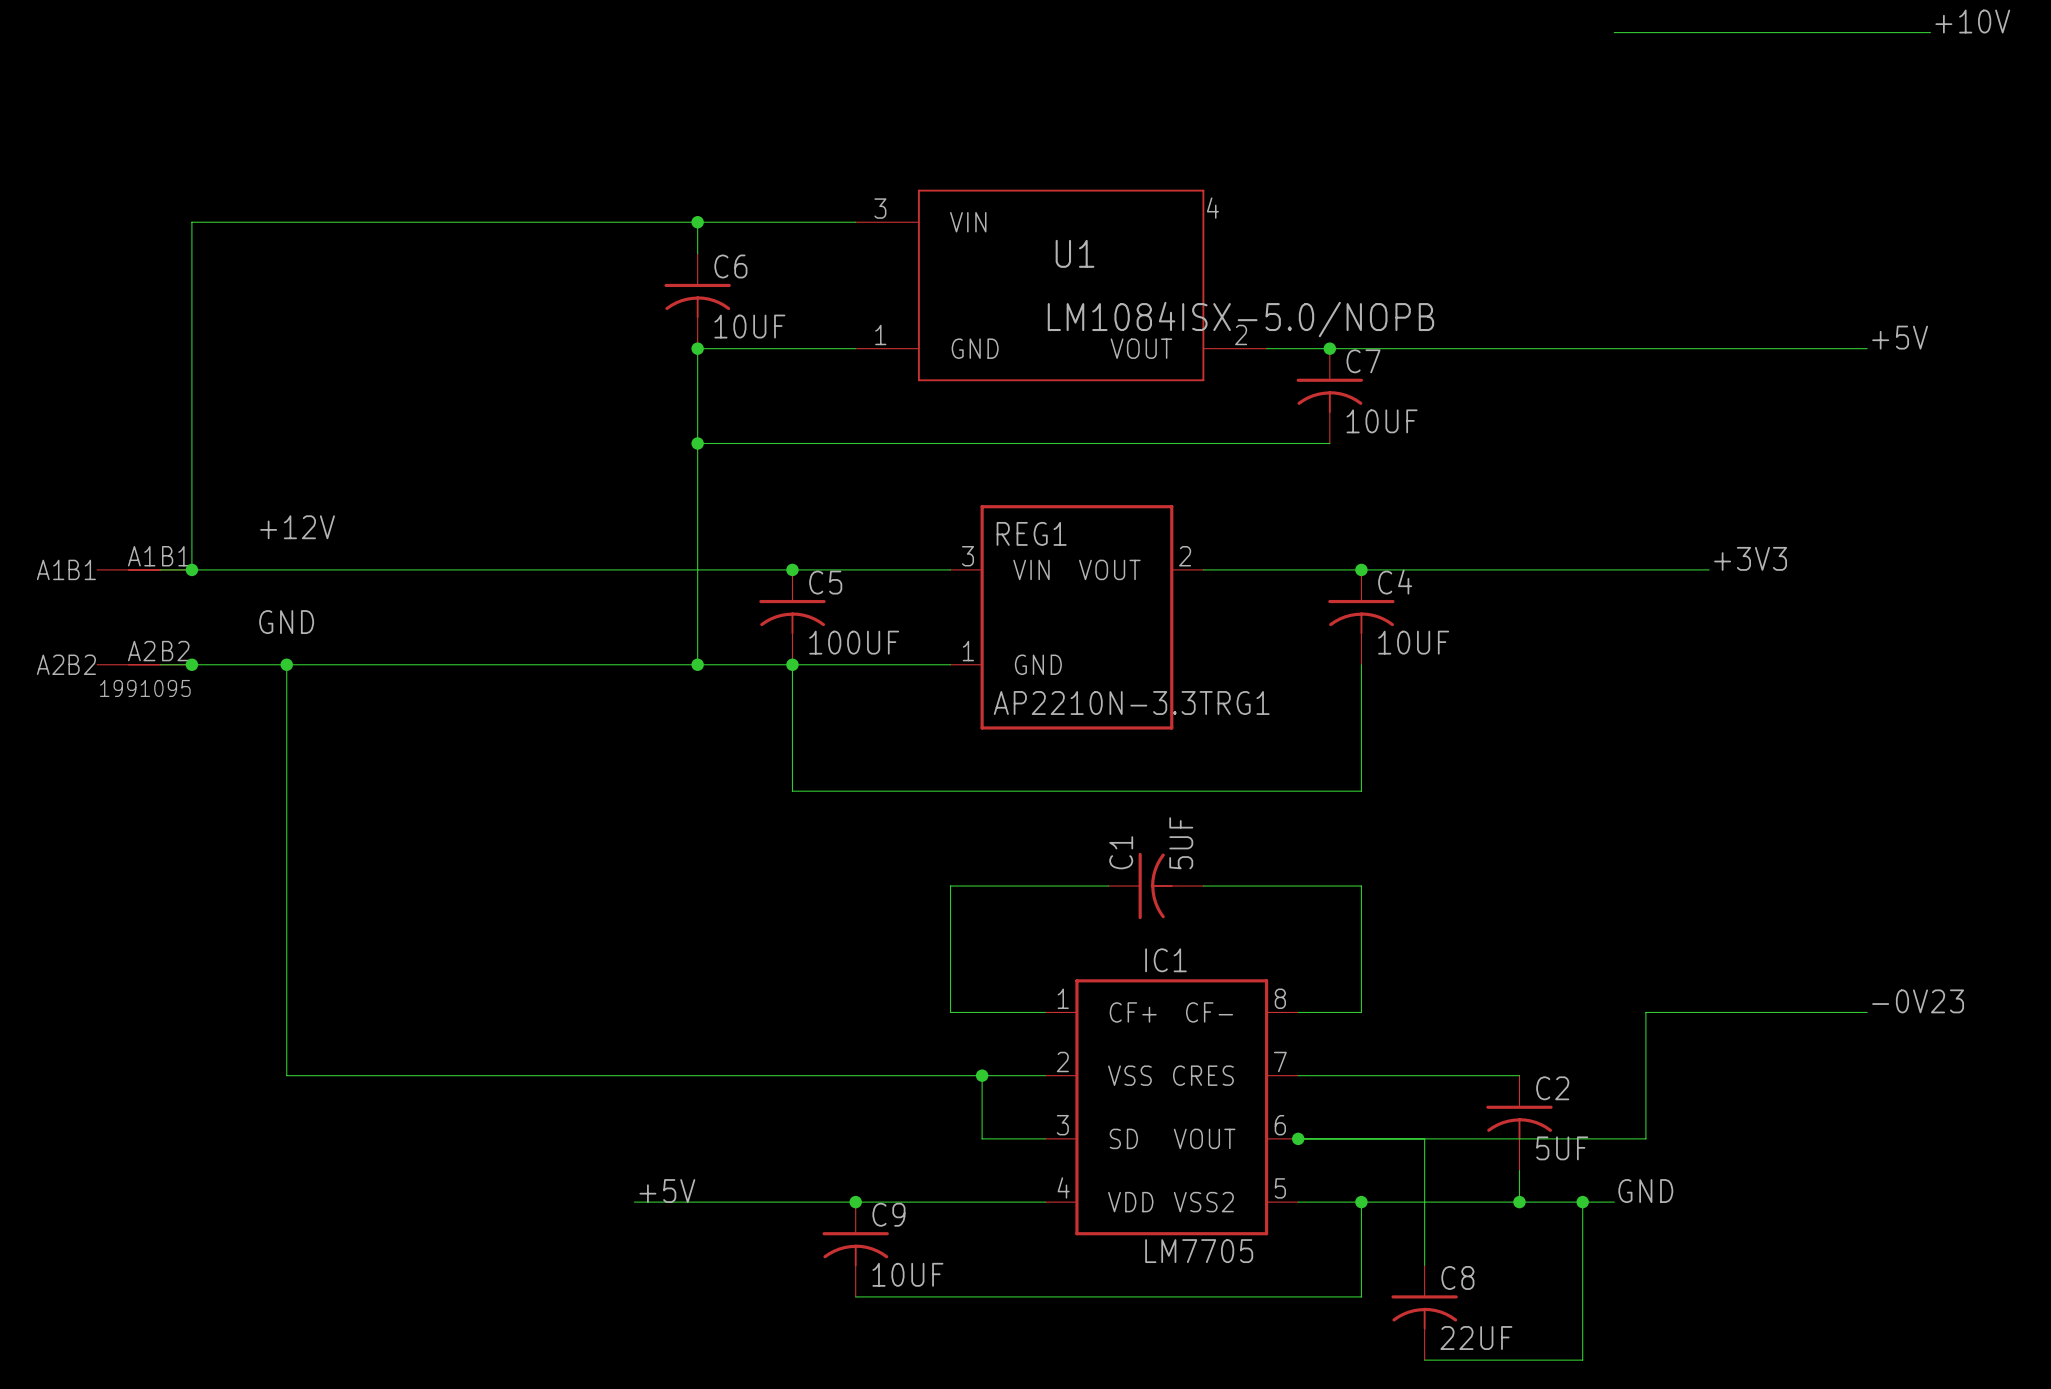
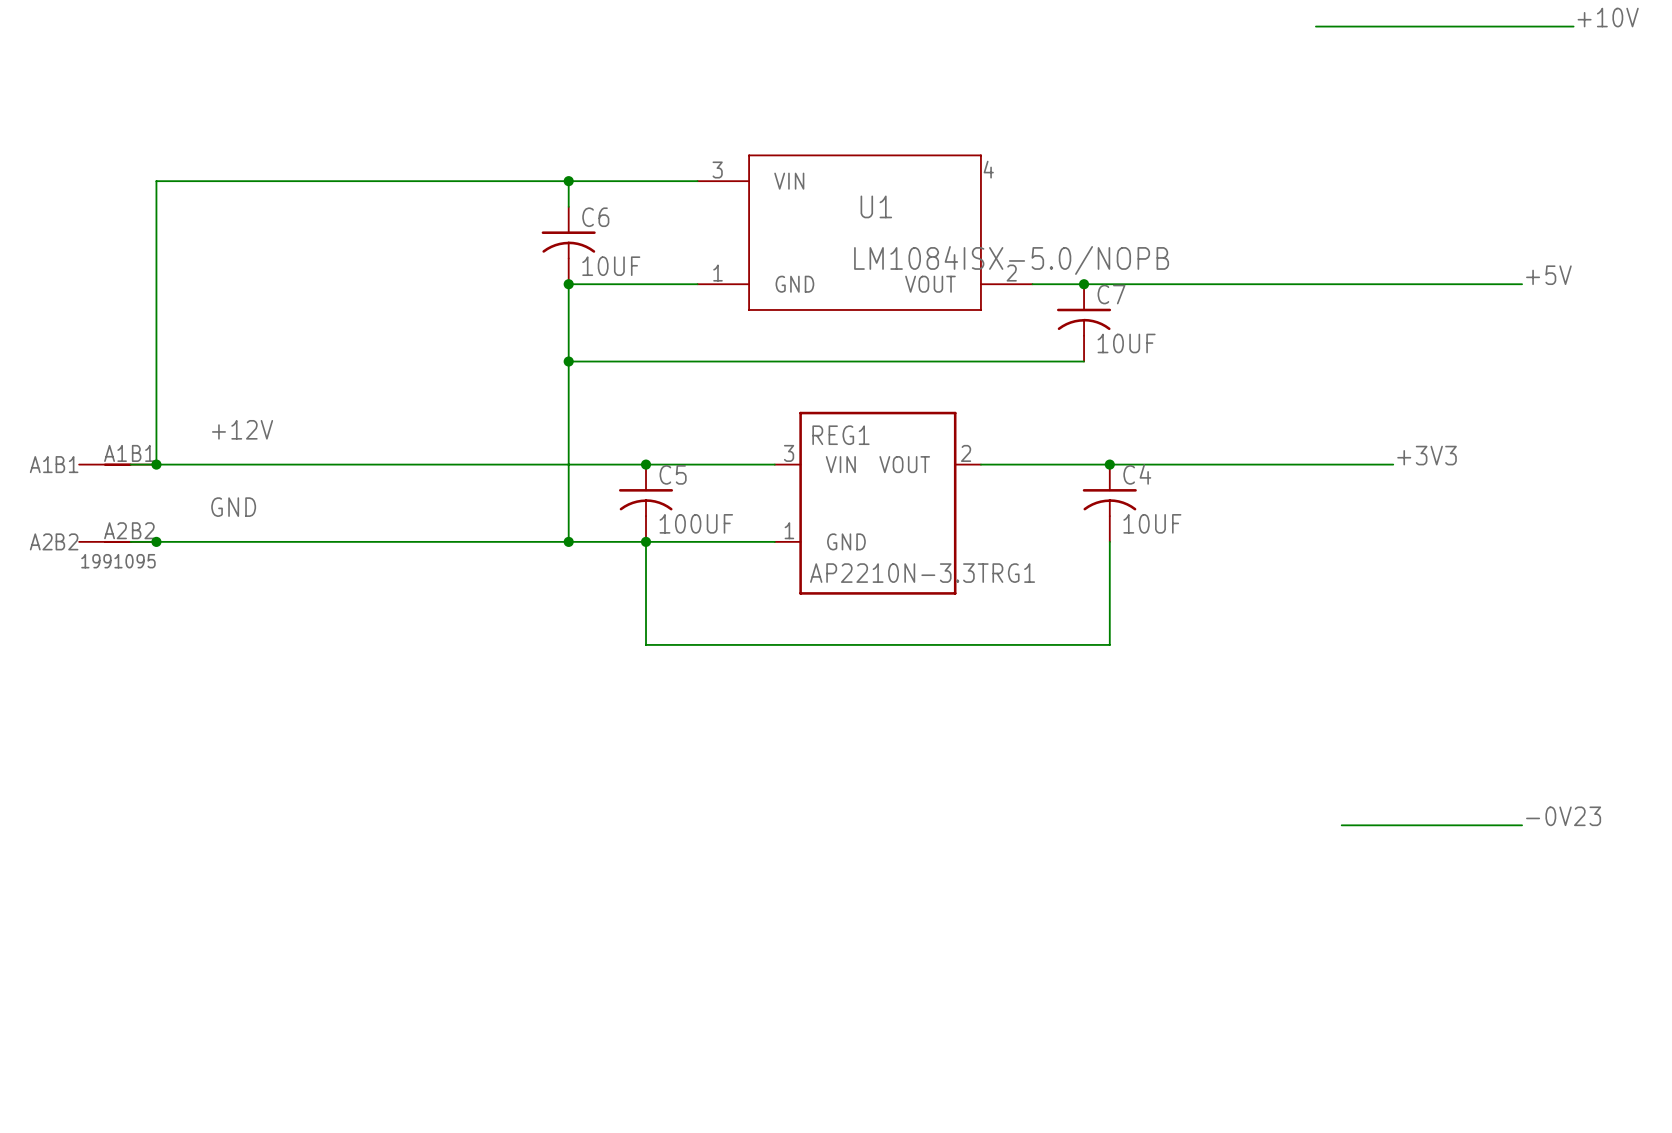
wire: (286, 664) (286, 1075) (1045, 1075) -> none
junction: (286, 664) -> none
wire: (1108, 886) (950, 886) (950, 1012) (1045, 1012) -> none
C1: 5UF (1155, 886) -> none
wire: (1203, 886) (1361, 886) (1361, 1012) (1298, 1012) -> none
wire: (1645, 1012) (1645, 1138) (1298, 1138) -> none
wire: (982, 1075) (982, 1138) (1045, 1138) -> none
junction: (982, 1075) -> none
wire: (1298, 1075) (1519, 1075) -> none
IC1: LM7705 (1171, 1107) -> none
C2: 5UF (1519, 1123) -> none
junction: (1298, 1138) -> none
wire: (1424, 1138) (1424, 1265) -> none
wire: (1519, 1170) (1519, 1202) -> none
label: +5V (667, 1191) -> none
label: GND (1645, 1191) -> none
wire: (634, 1202) (1045, 1202) -> none
junction: (855, 1202) -> none
wire: (1298, 1202) (1614, 1202) -> none
wire: (1361, 1202) (1361, 1296) (855, 1296) -> none
junction: (1361, 1202) -> none
junction: (1519, 1202) -> none
wire: (1582, 1202) (1582, 1360) (1424, 1360) -> none
junction: (1582, 1202) -> none
C9: 10UF (855, 1249) -> none
C8: 22UF (1424, 1312) -> none

